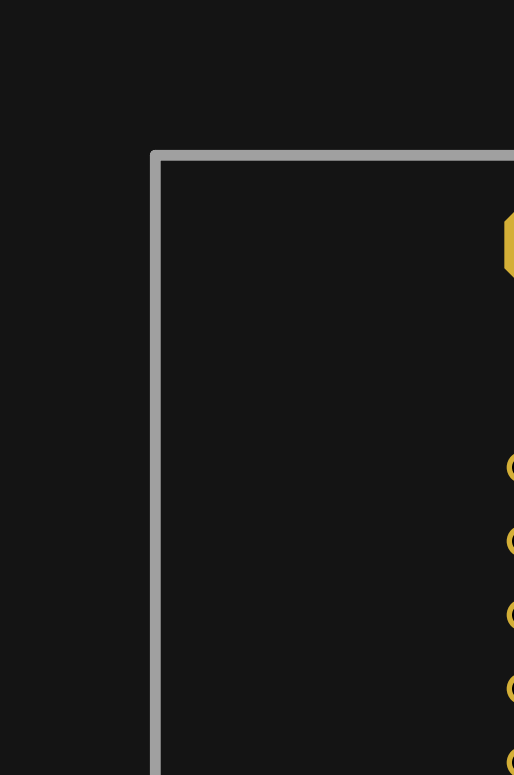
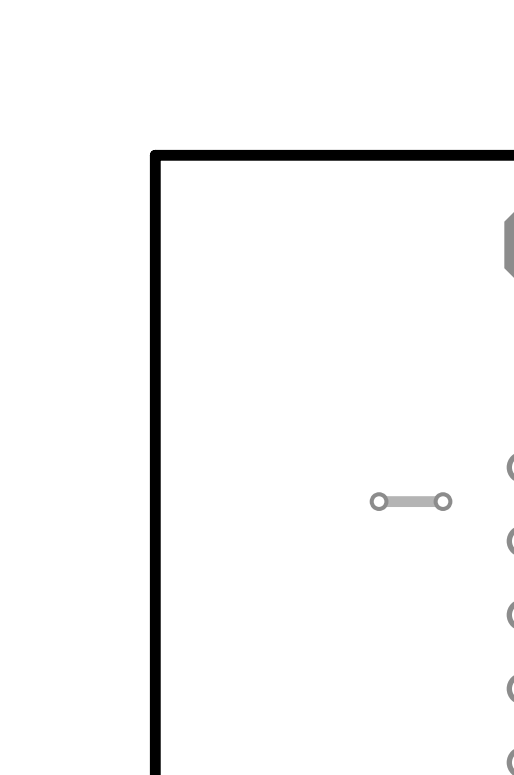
via: none -> (379, 501)
track: none -> (443, 501) (379, 501)
via: none -> (443, 501)

